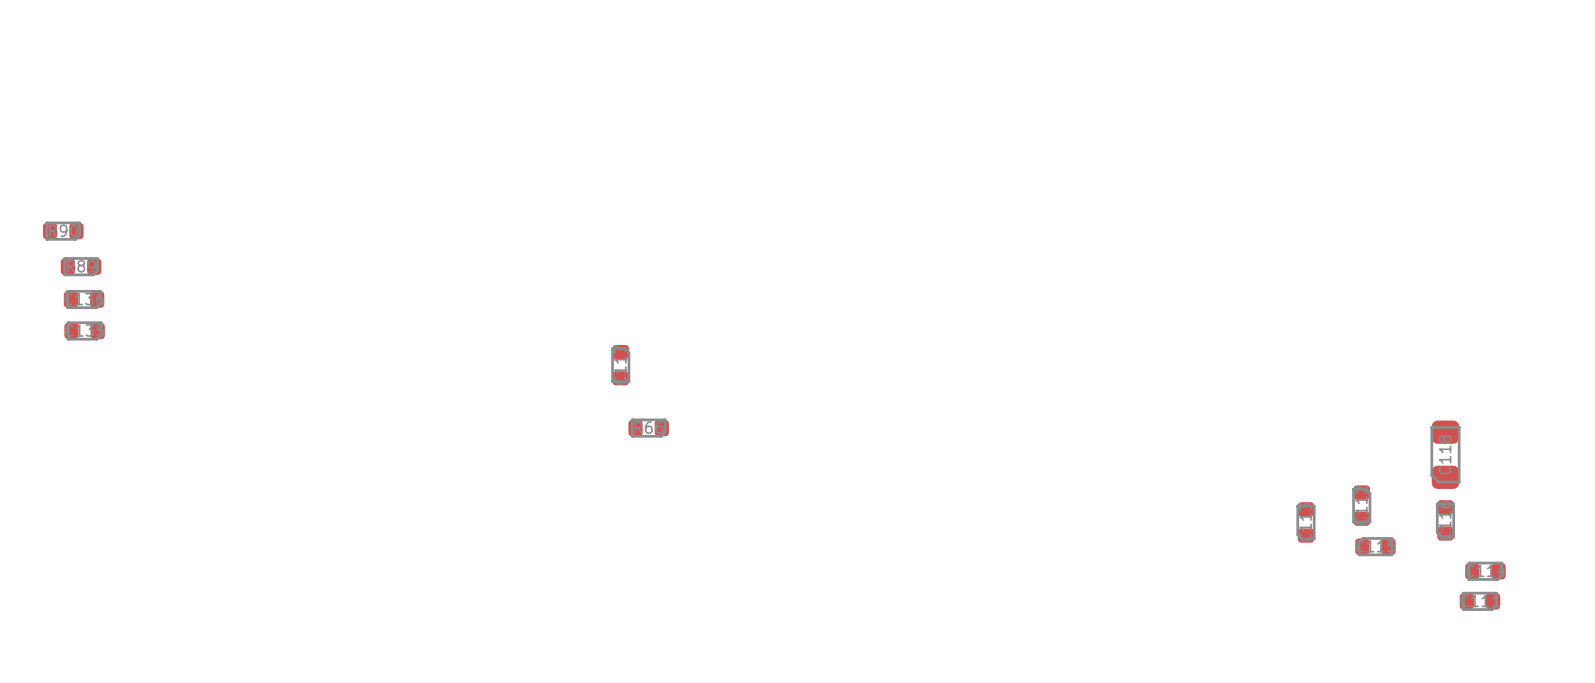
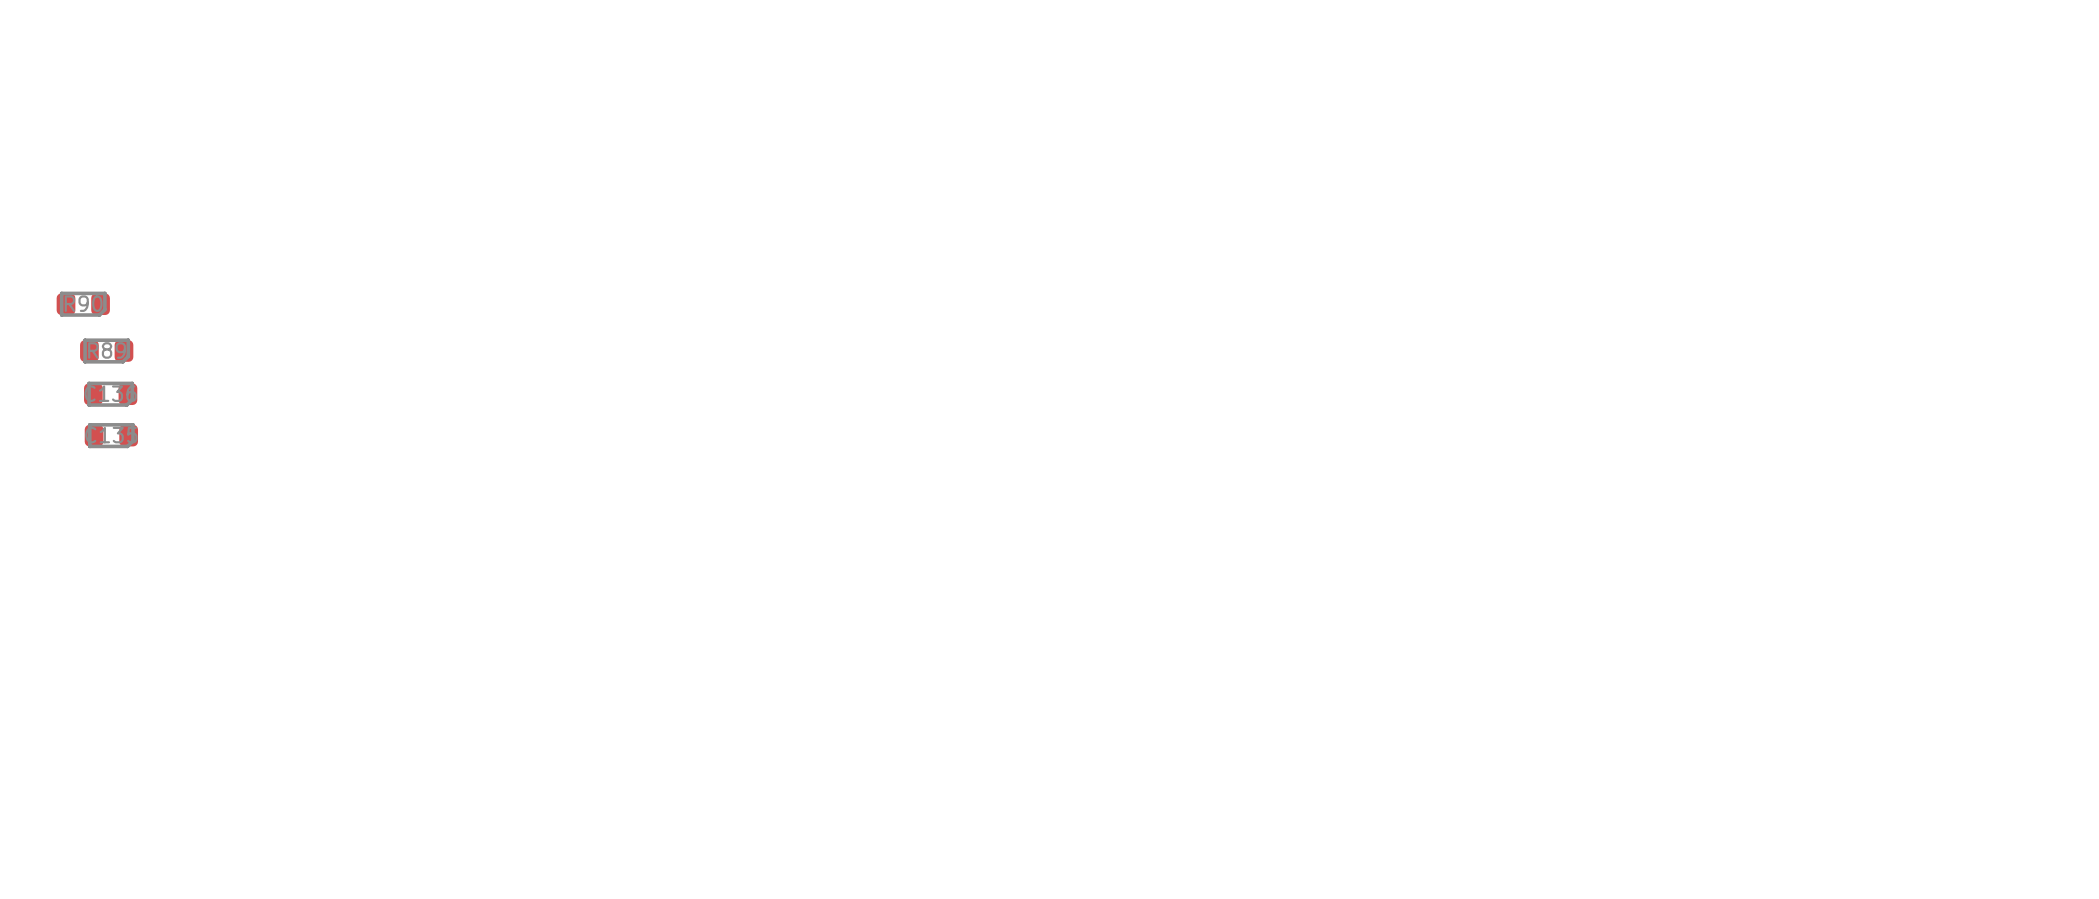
part: (620, 365) -> none
part: (648, 428) -> none
part: (1445, 454) -> none
part: (1361, 505) -> none
part: (1445, 520) -> none
part: (1305, 522) -> none
part: (1375, 546) -> none
part: (1485, 571) -> none
part: (1479, 601) -> none

